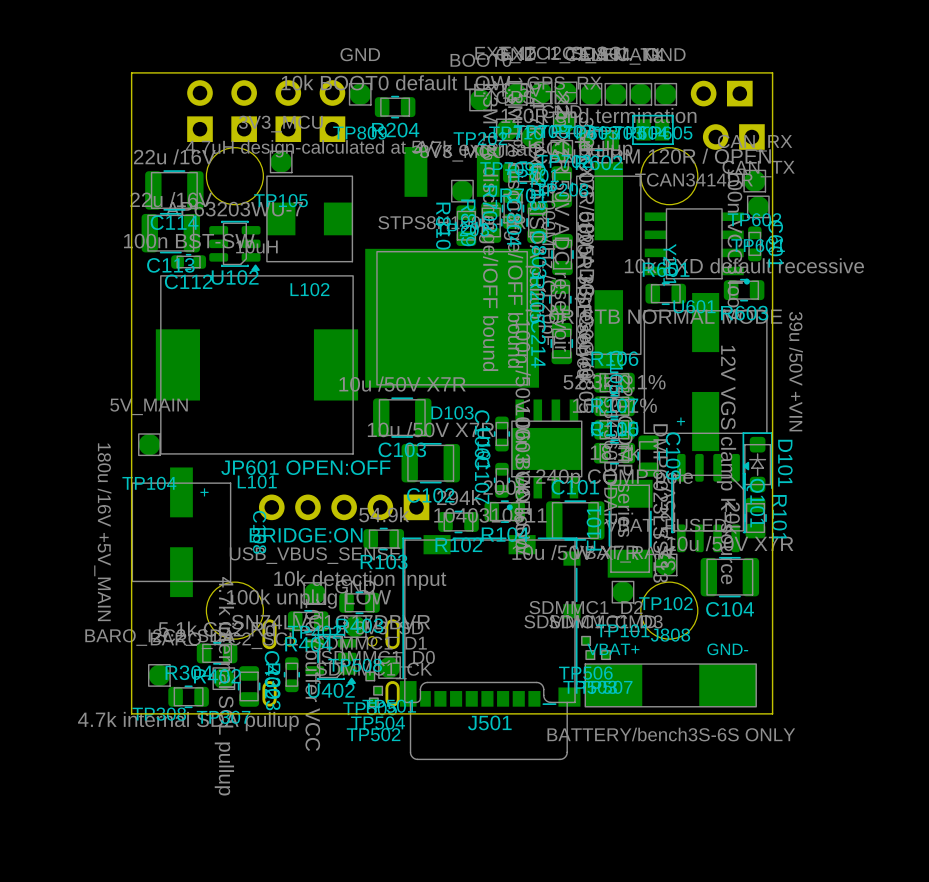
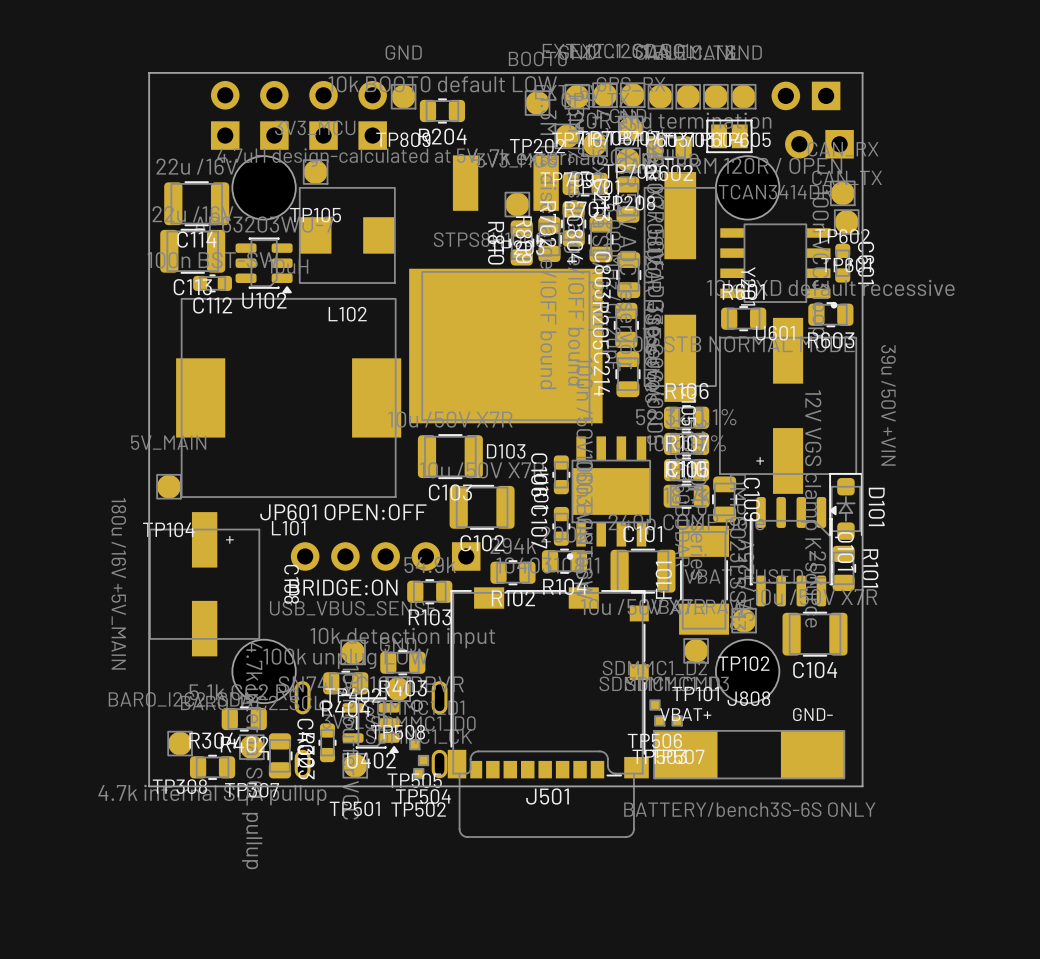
TP501 position: (389, 667) -> (355, 765)

